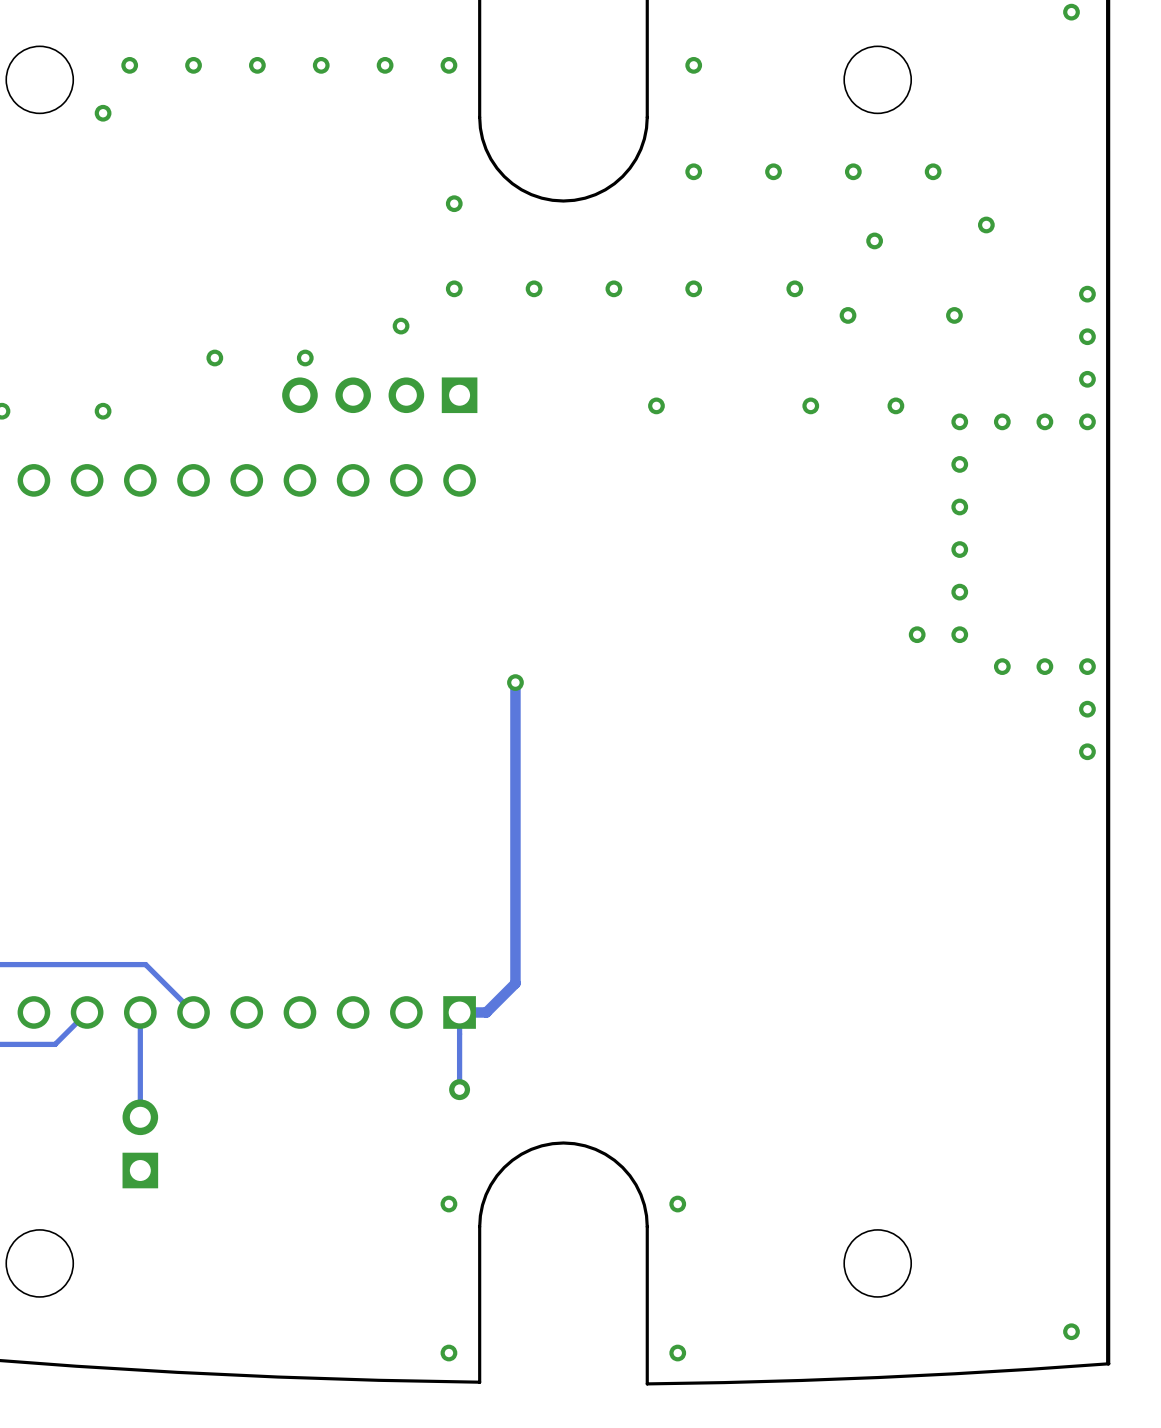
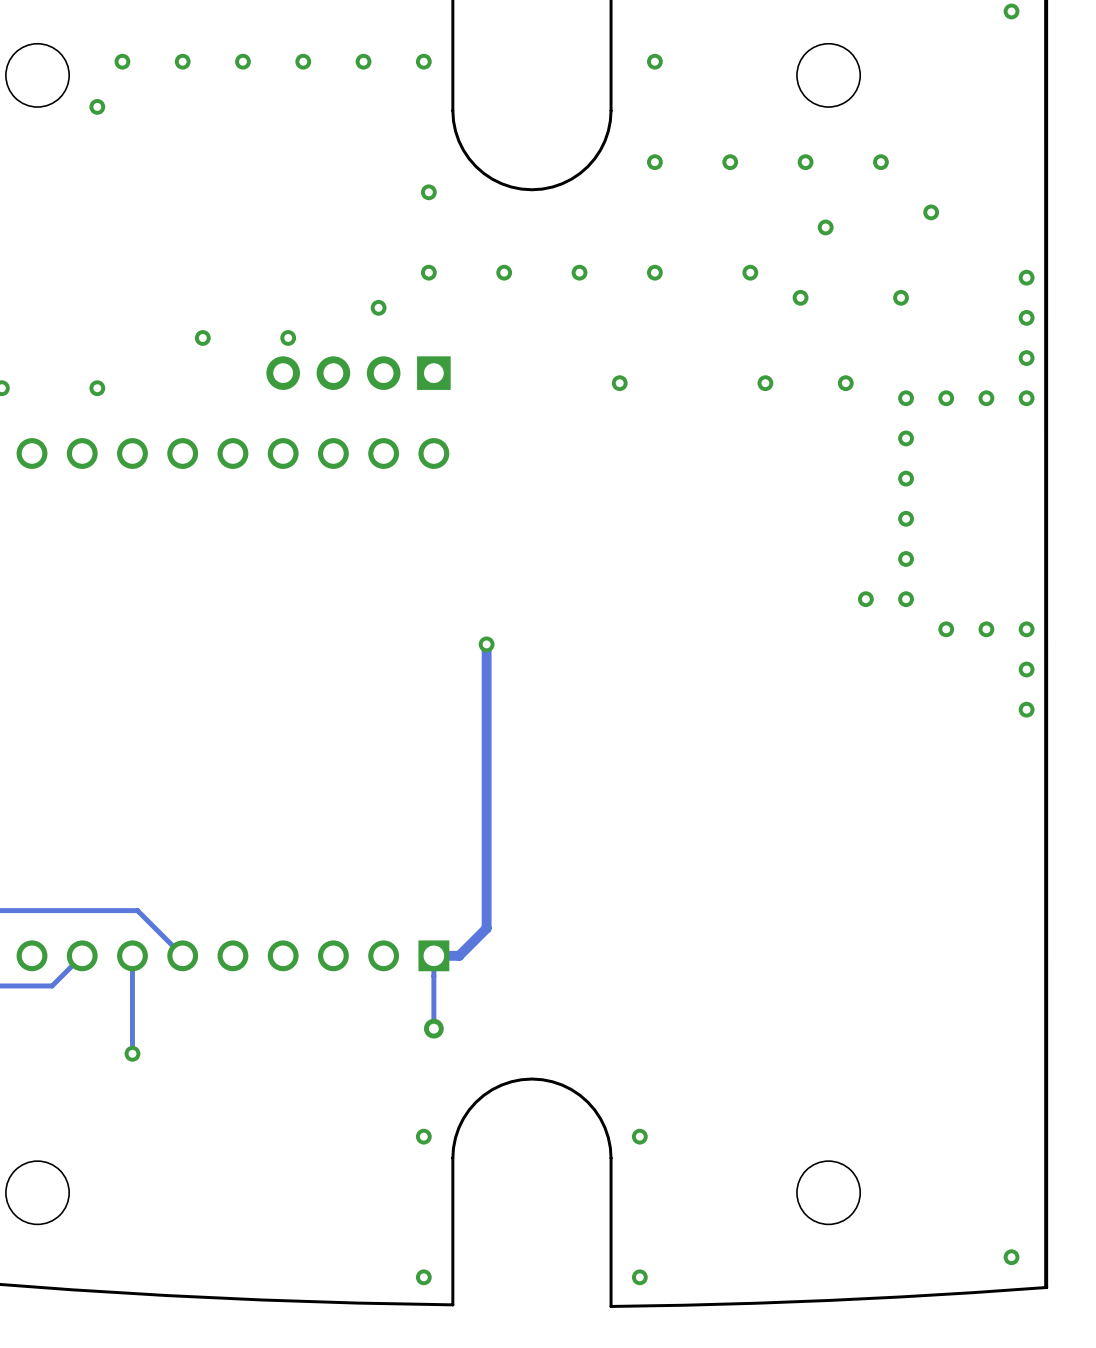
via: none -> (132, 1053)
part: (140, 1143) -> none

